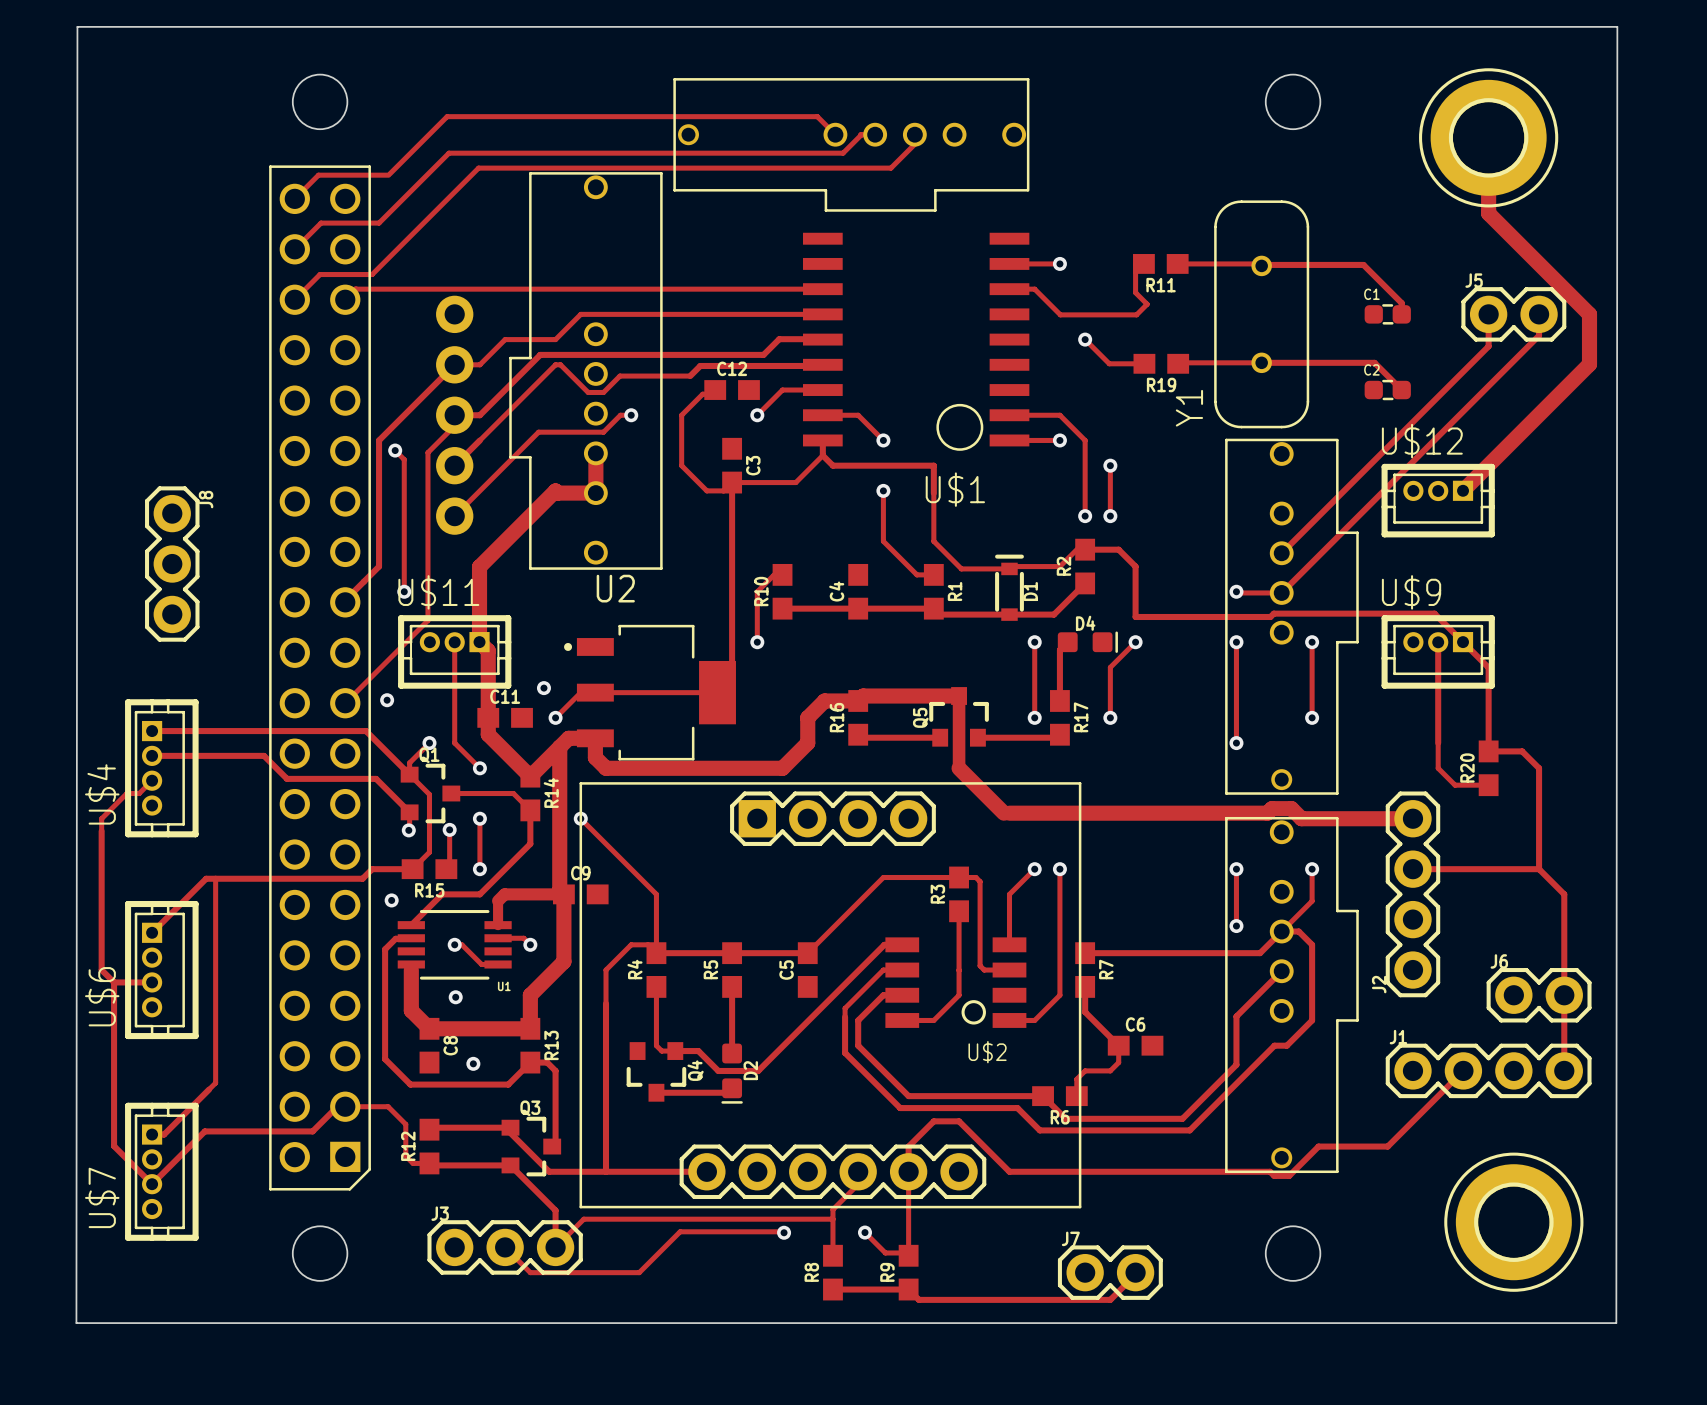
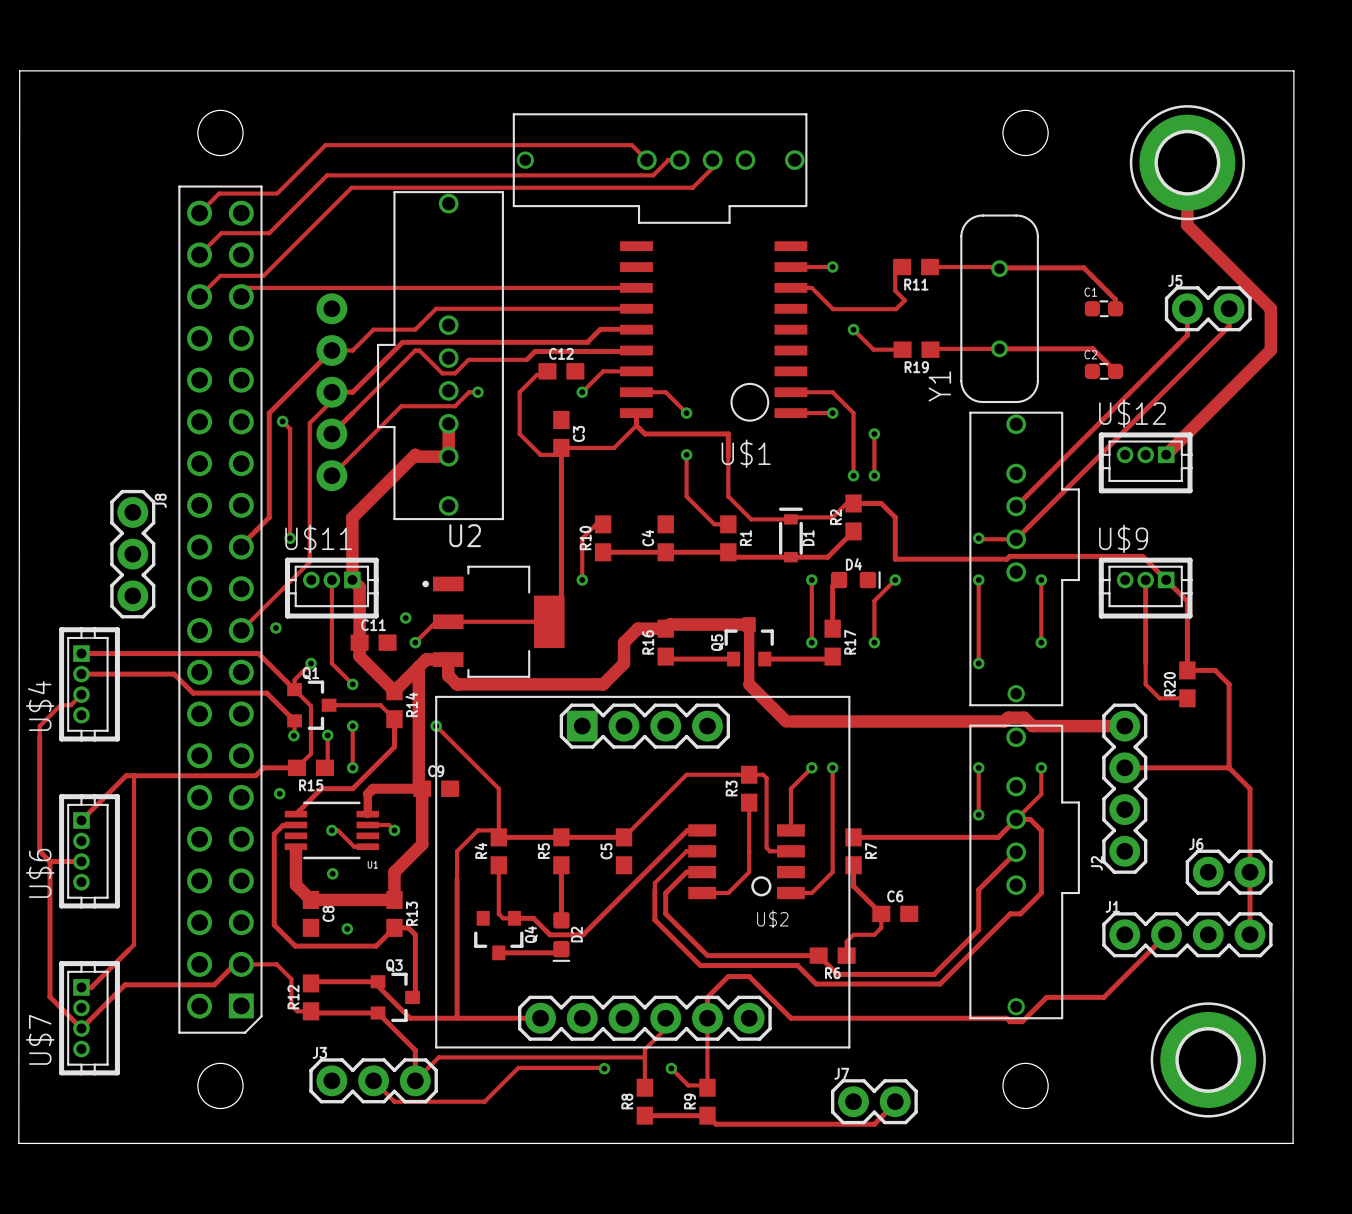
J8 position: (172, 564) -> (132, 554)

